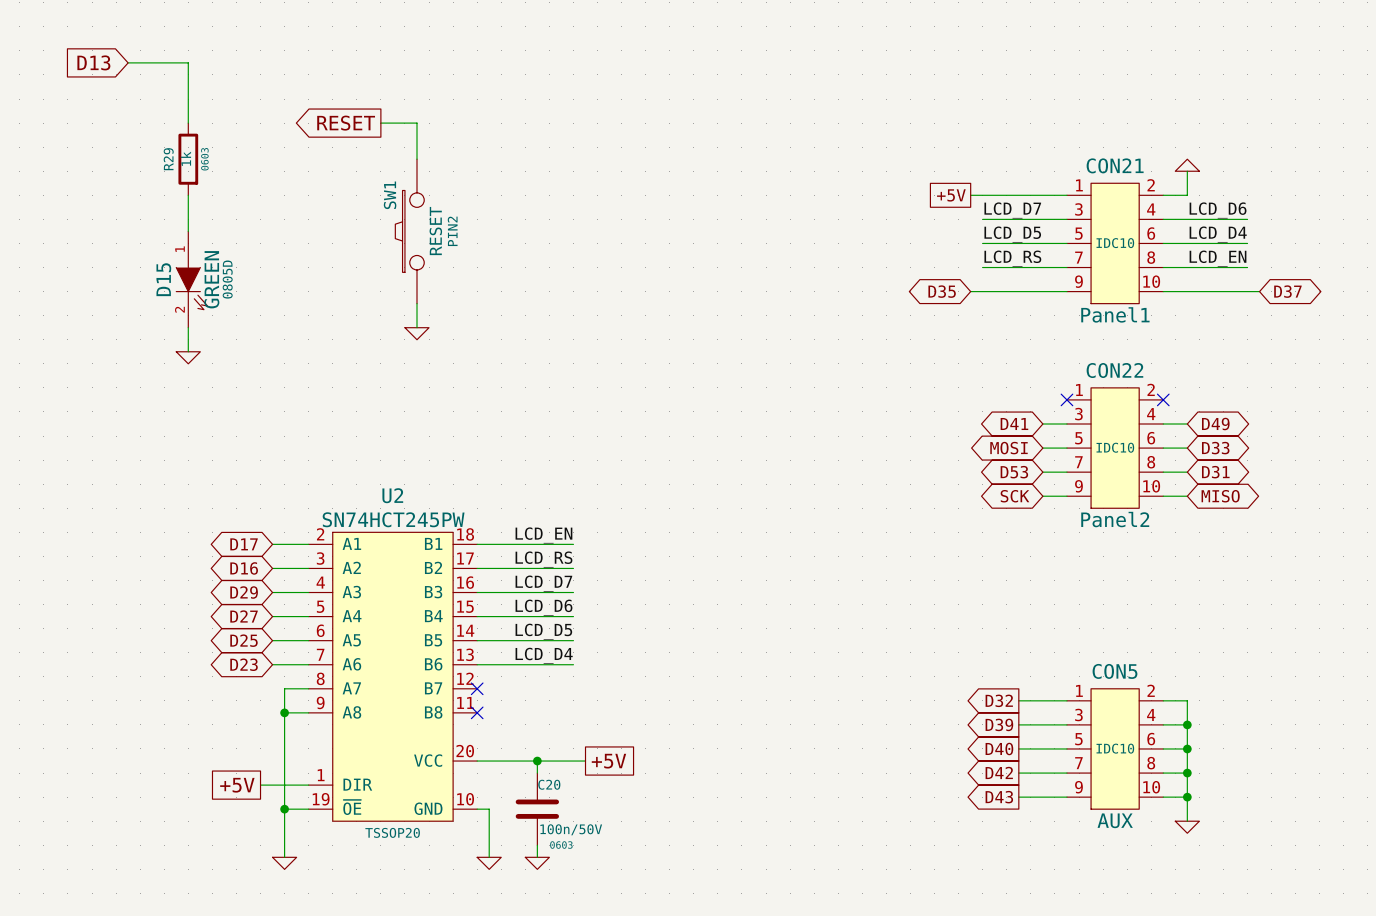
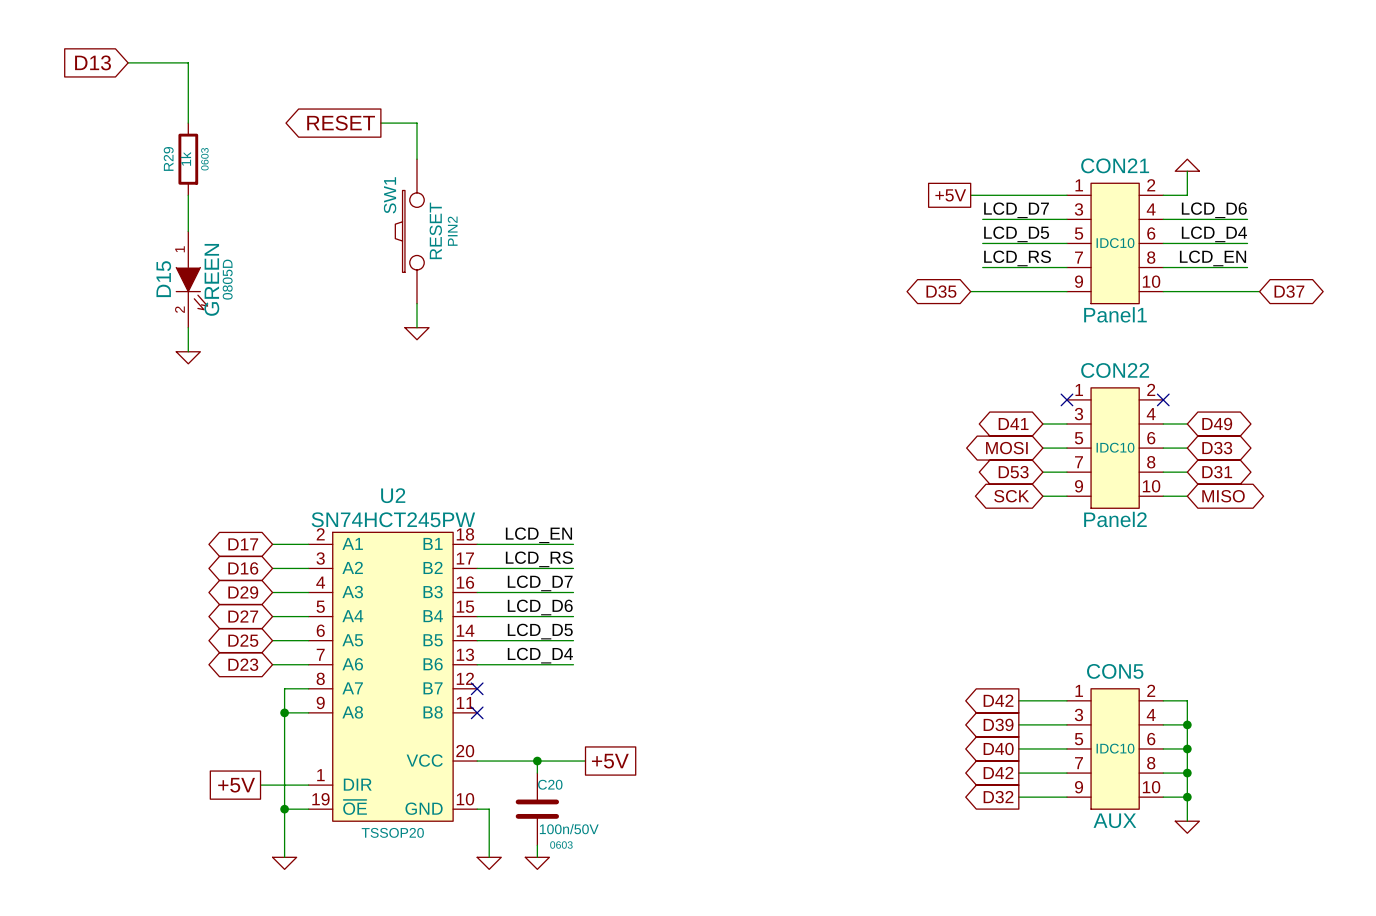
global label: D32 (999, 700) -> D42 (998, 700)
global label: D43 (999, 797) -> D32 (998, 797)

